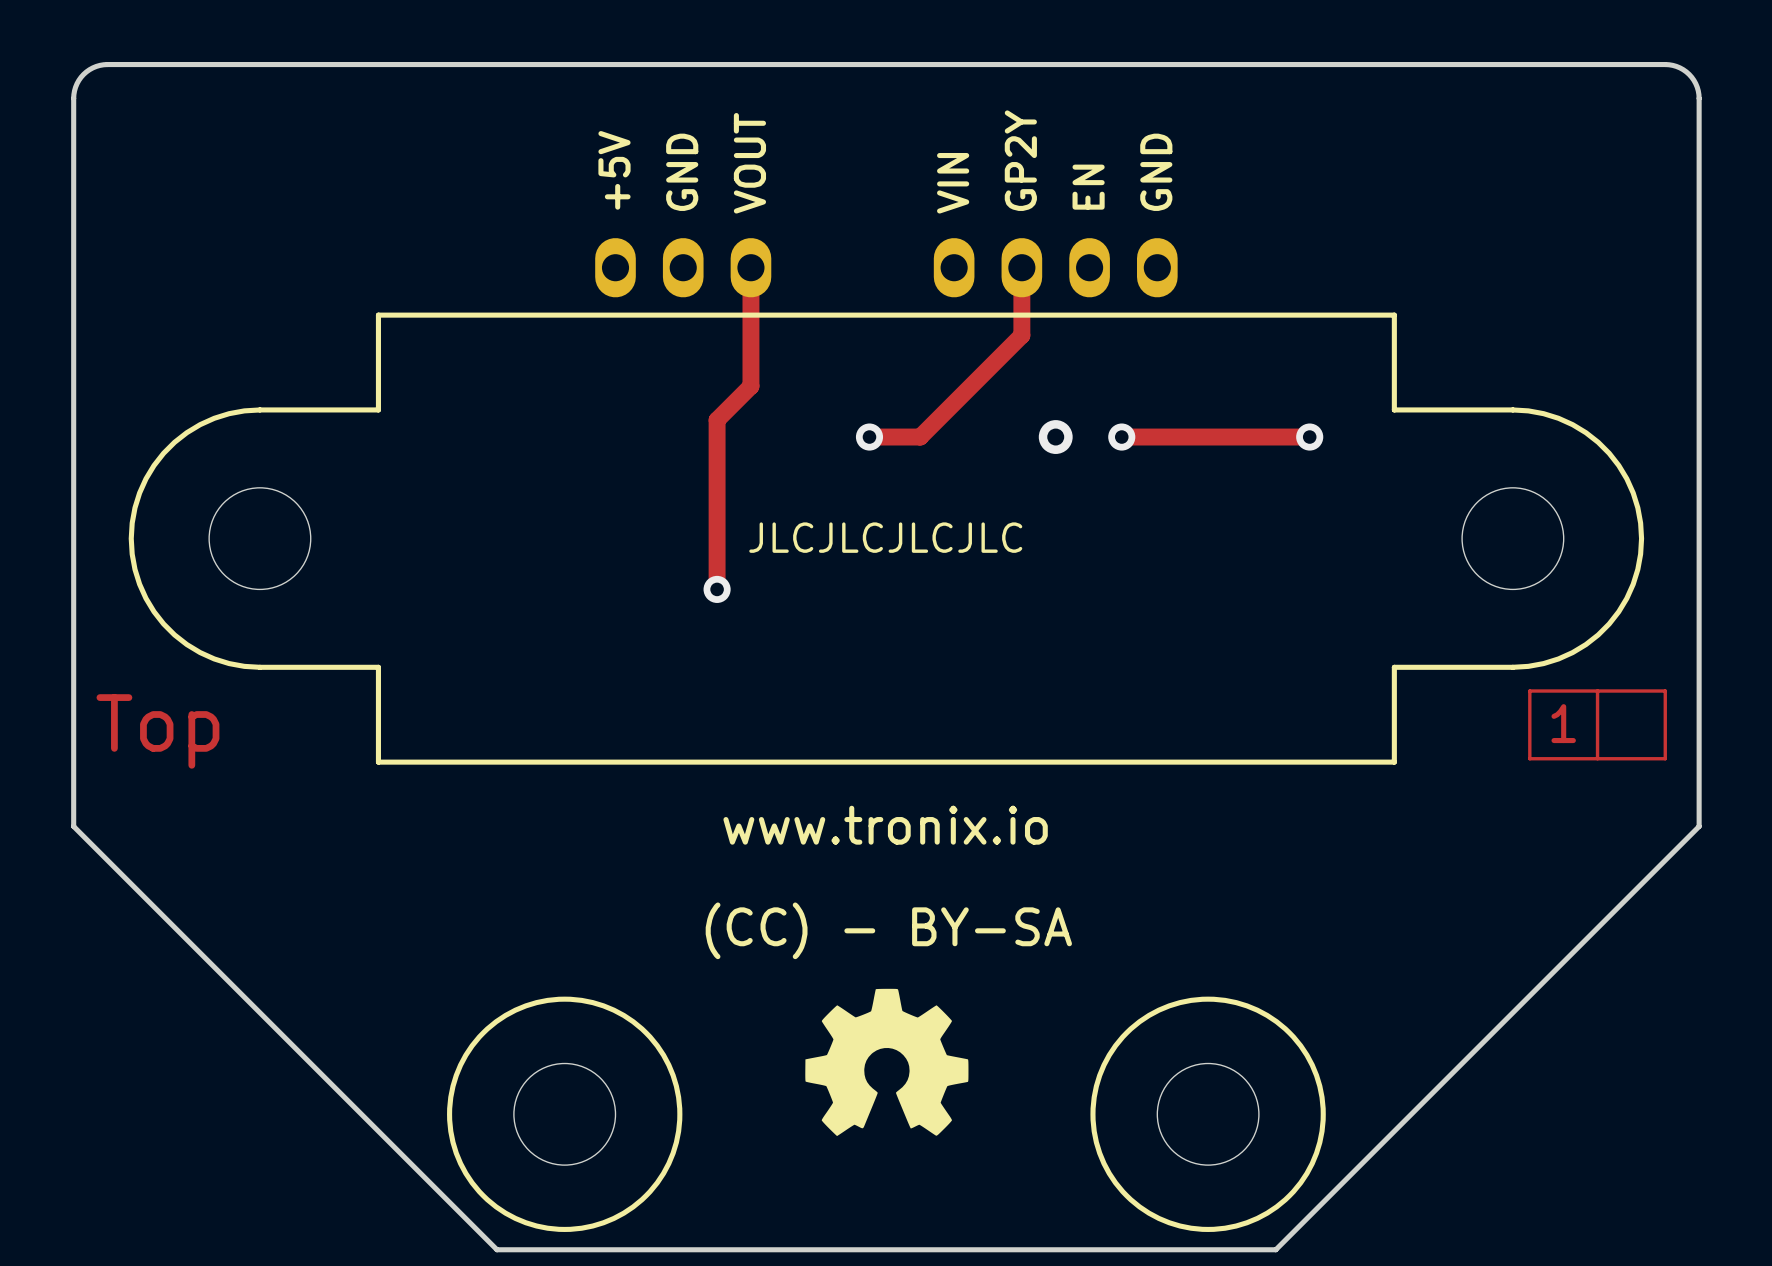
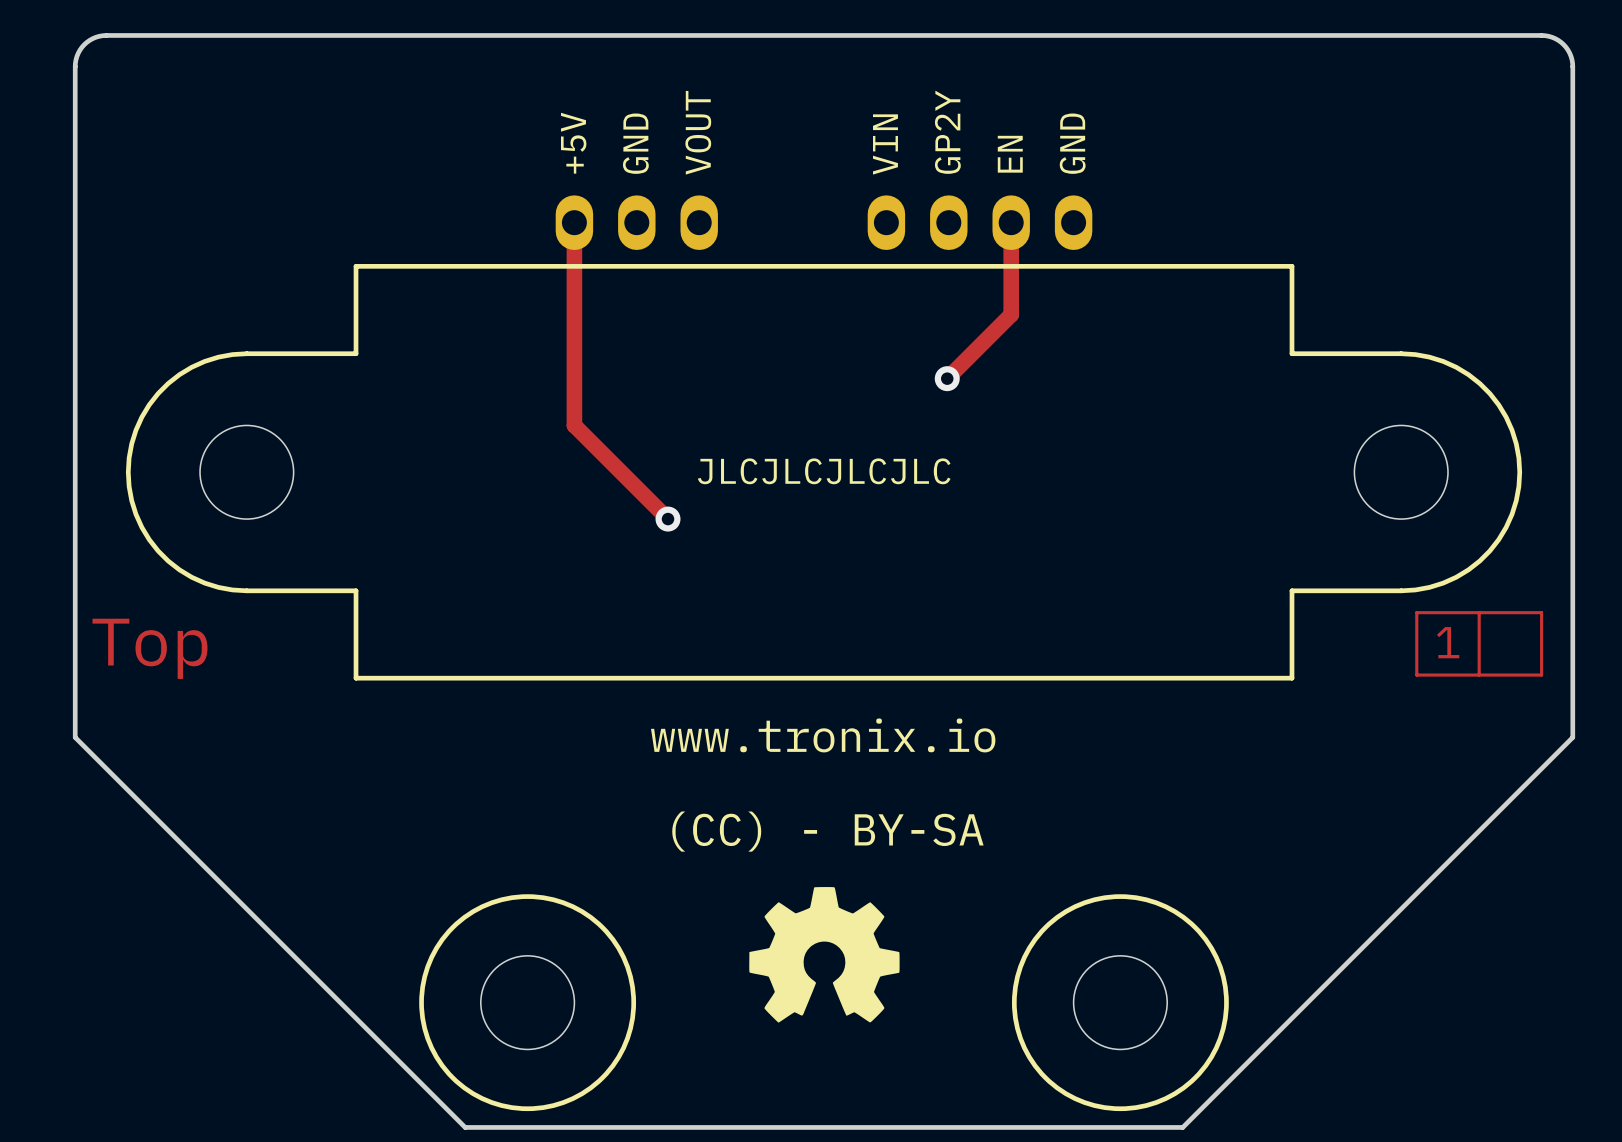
track: (750, 267) (750, 386) (717, 420) (717, 589) -> (574, 222) (574, 425) (668, 519)
track: (1021, 267) (1021, 335) (920, 437) (869, 437) -> none
track: none -> (1011, 222) (1011, 314) (947, 378)
via: (869, 437) -> none
via: none -> (947, 378)
via: (1055, 437) -> none
track: (1121, 437) (1309, 437) -> none
via: (1121, 437) -> none
via: (1309, 437) -> none

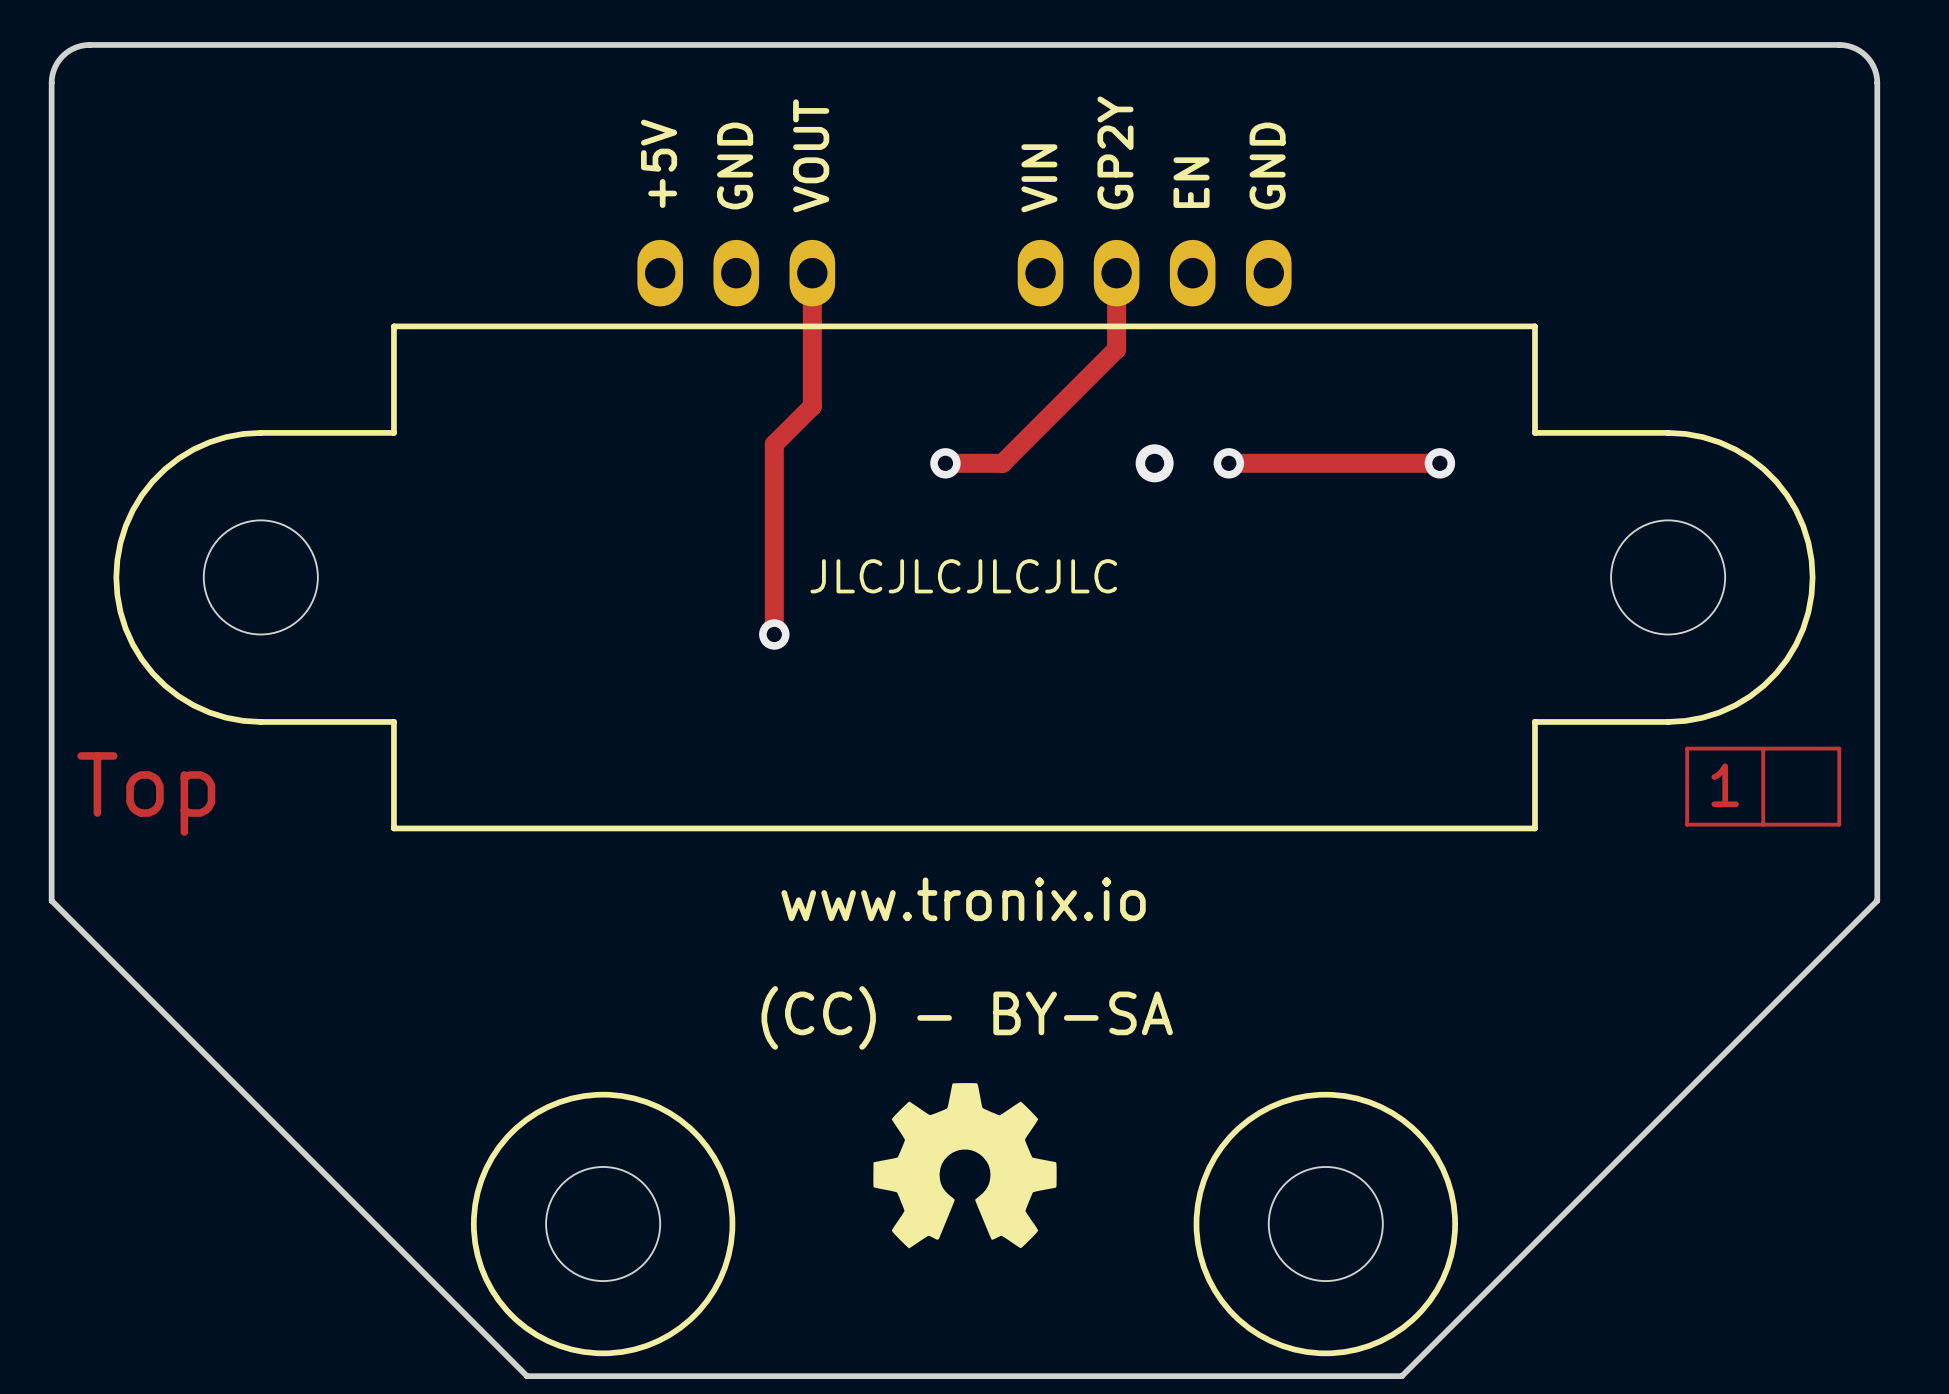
track: (574, 222) (574, 425) (668, 519) -> (812, 273) (812, 406) (774, 444) (774, 634)
track: none -> (1116, 273) (1116, 349) (1002, 463) (945, 463)
track: (1011, 222) (1011, 314) (947, 378) -> none
via: none -> (945, 463)
via: (947, 378) -> none
via: none -> (1154, 463)
track: none -> (1228, 463) (1439, 463)
via: none -> (1228, 463)
via: none -> (1439, 463)

